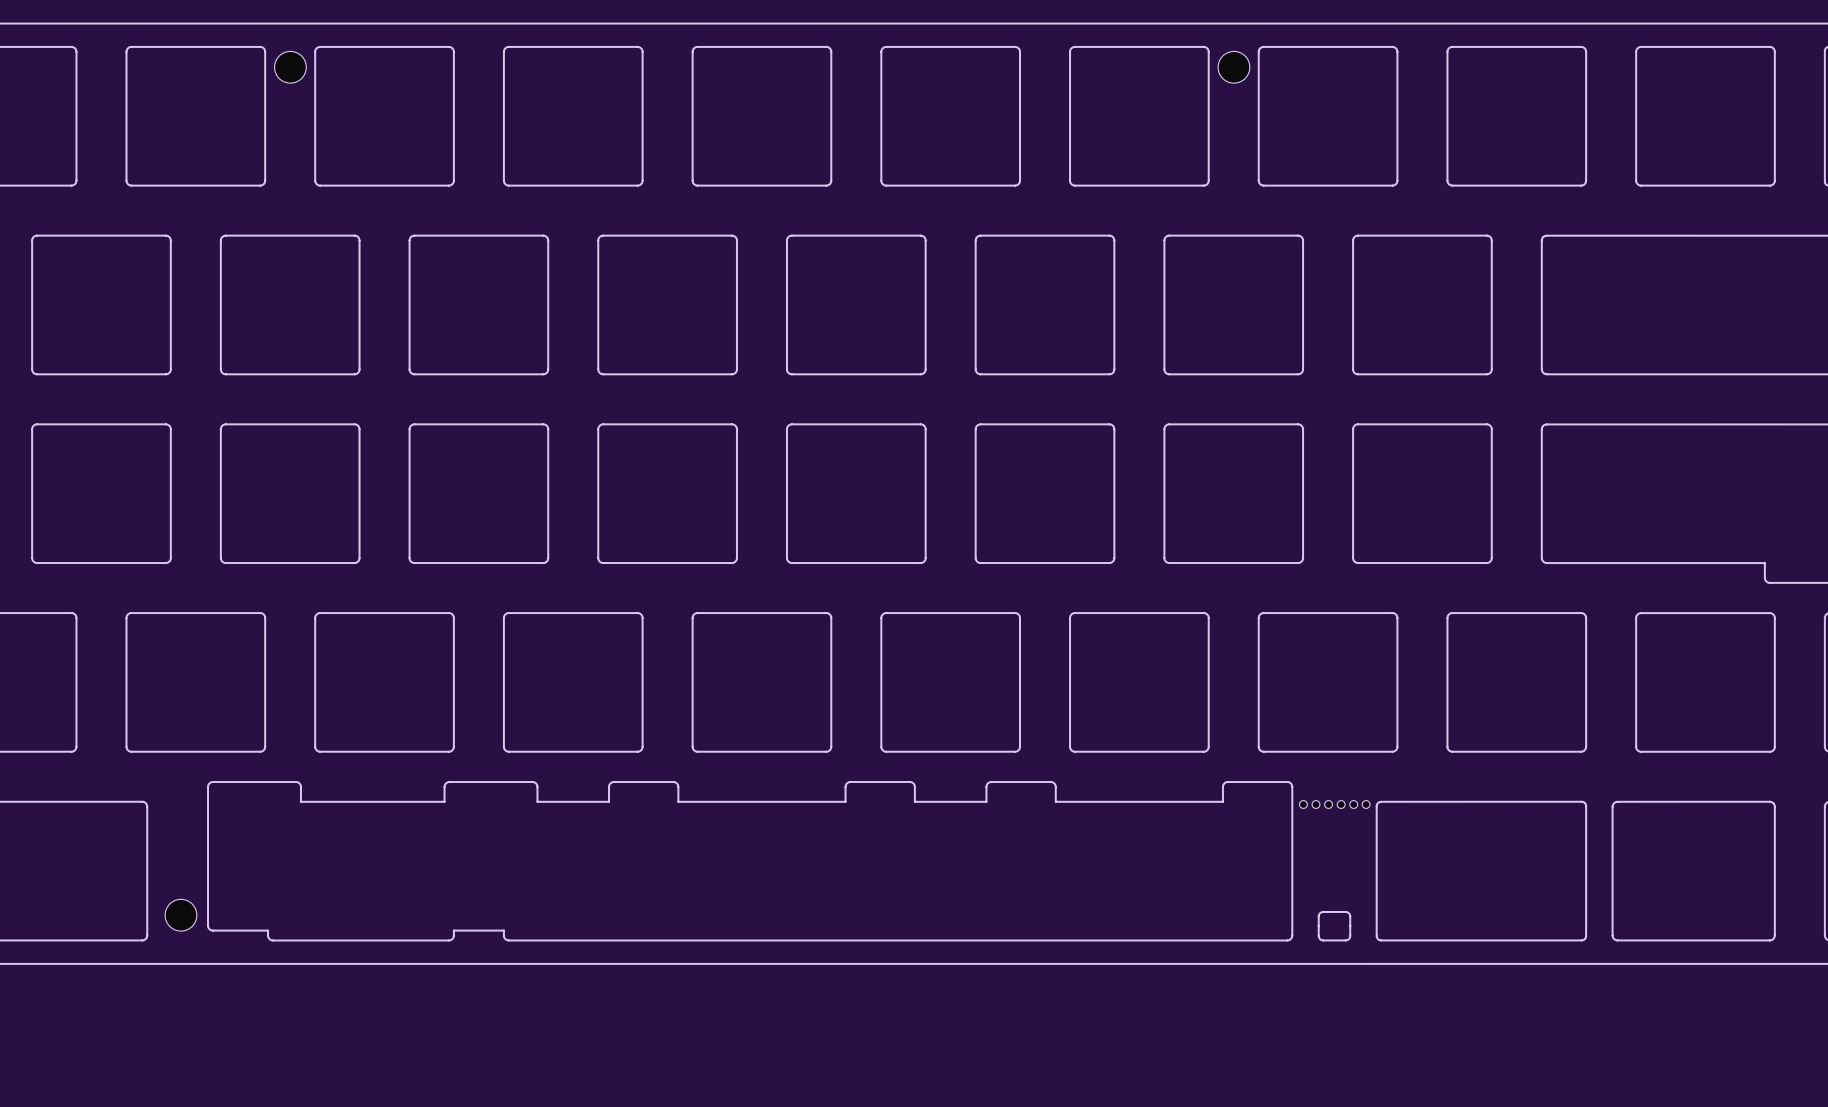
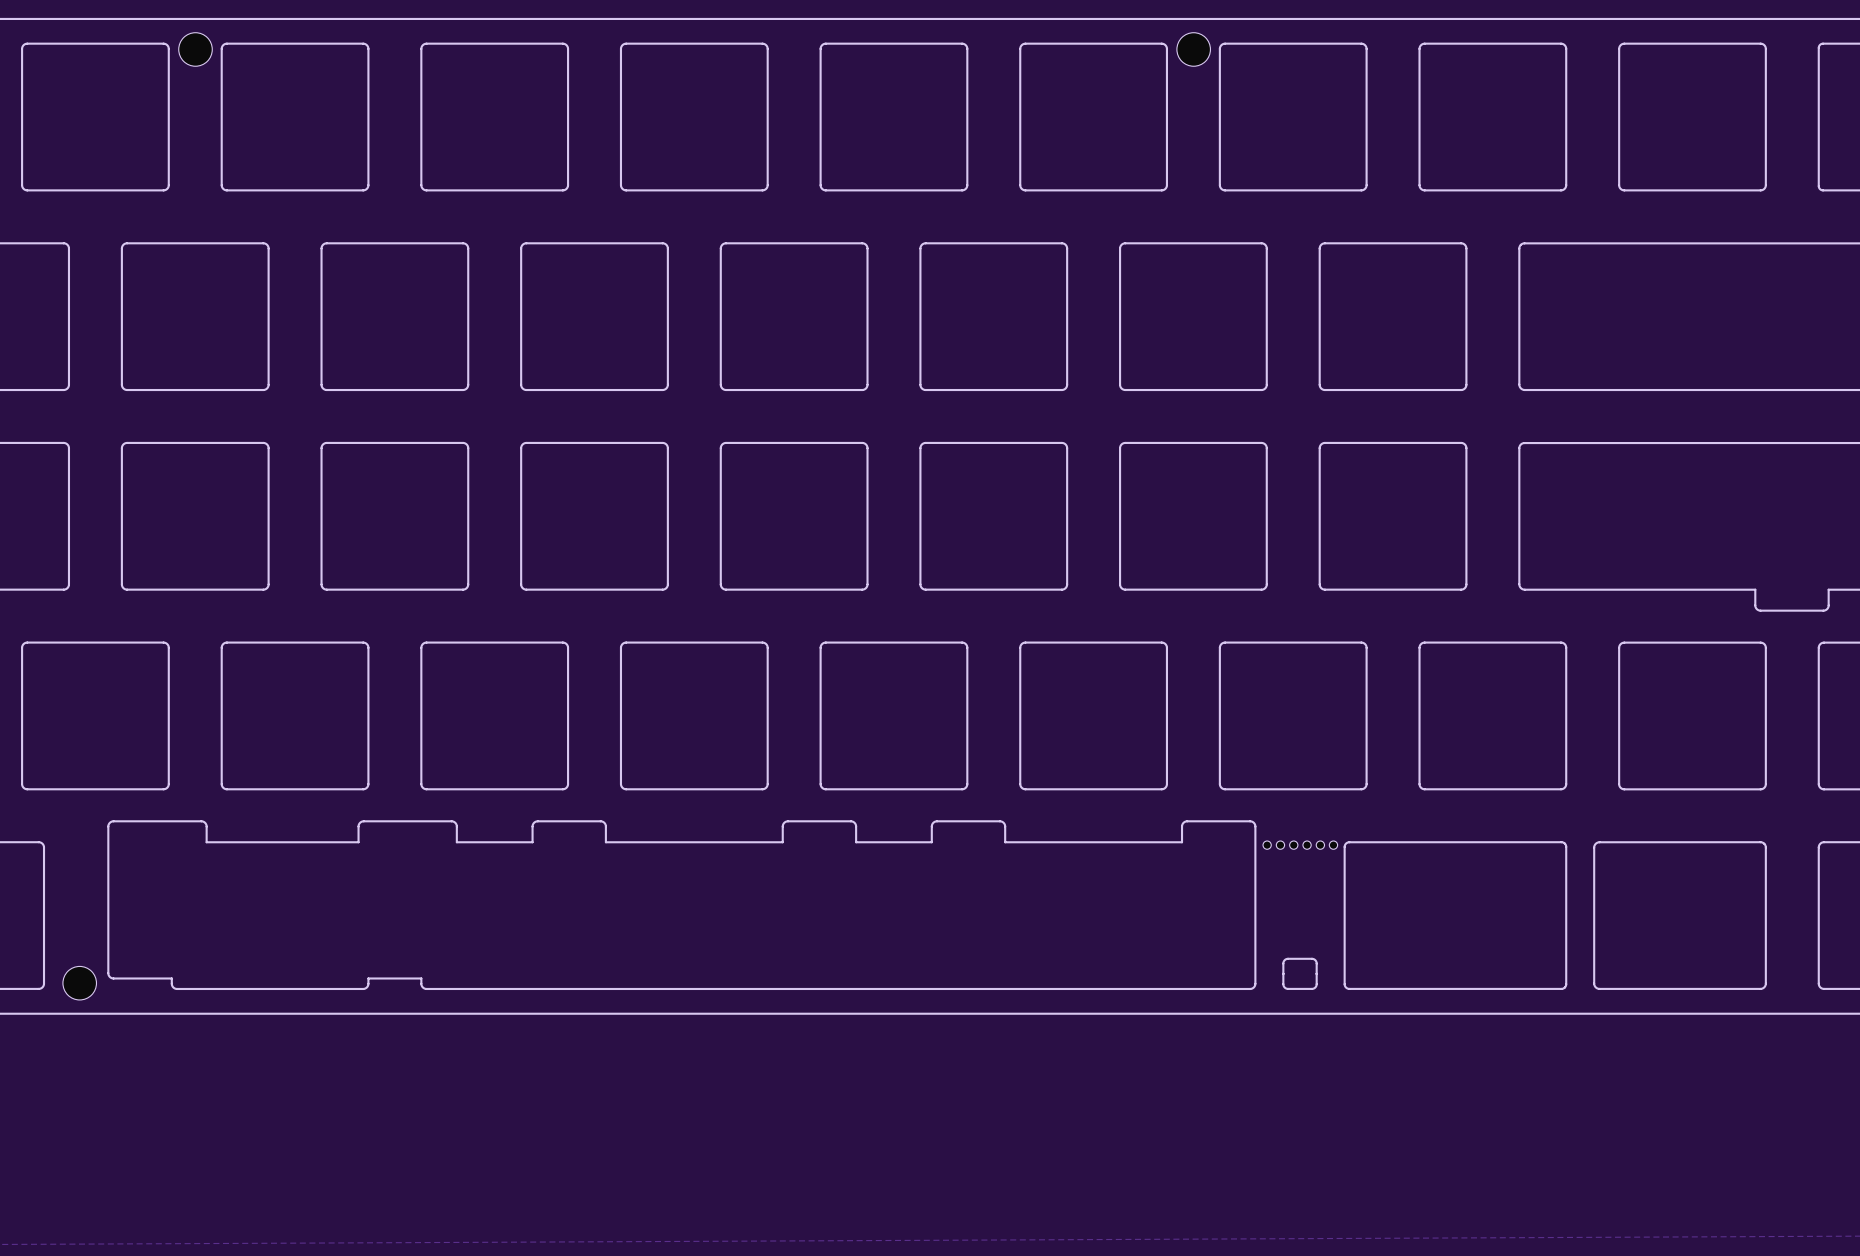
part position: (290, 67) -> (195, 49)
part position: (1233, 67) -> (1193, 49)
part position: (180, 915) -> (79, 983)

